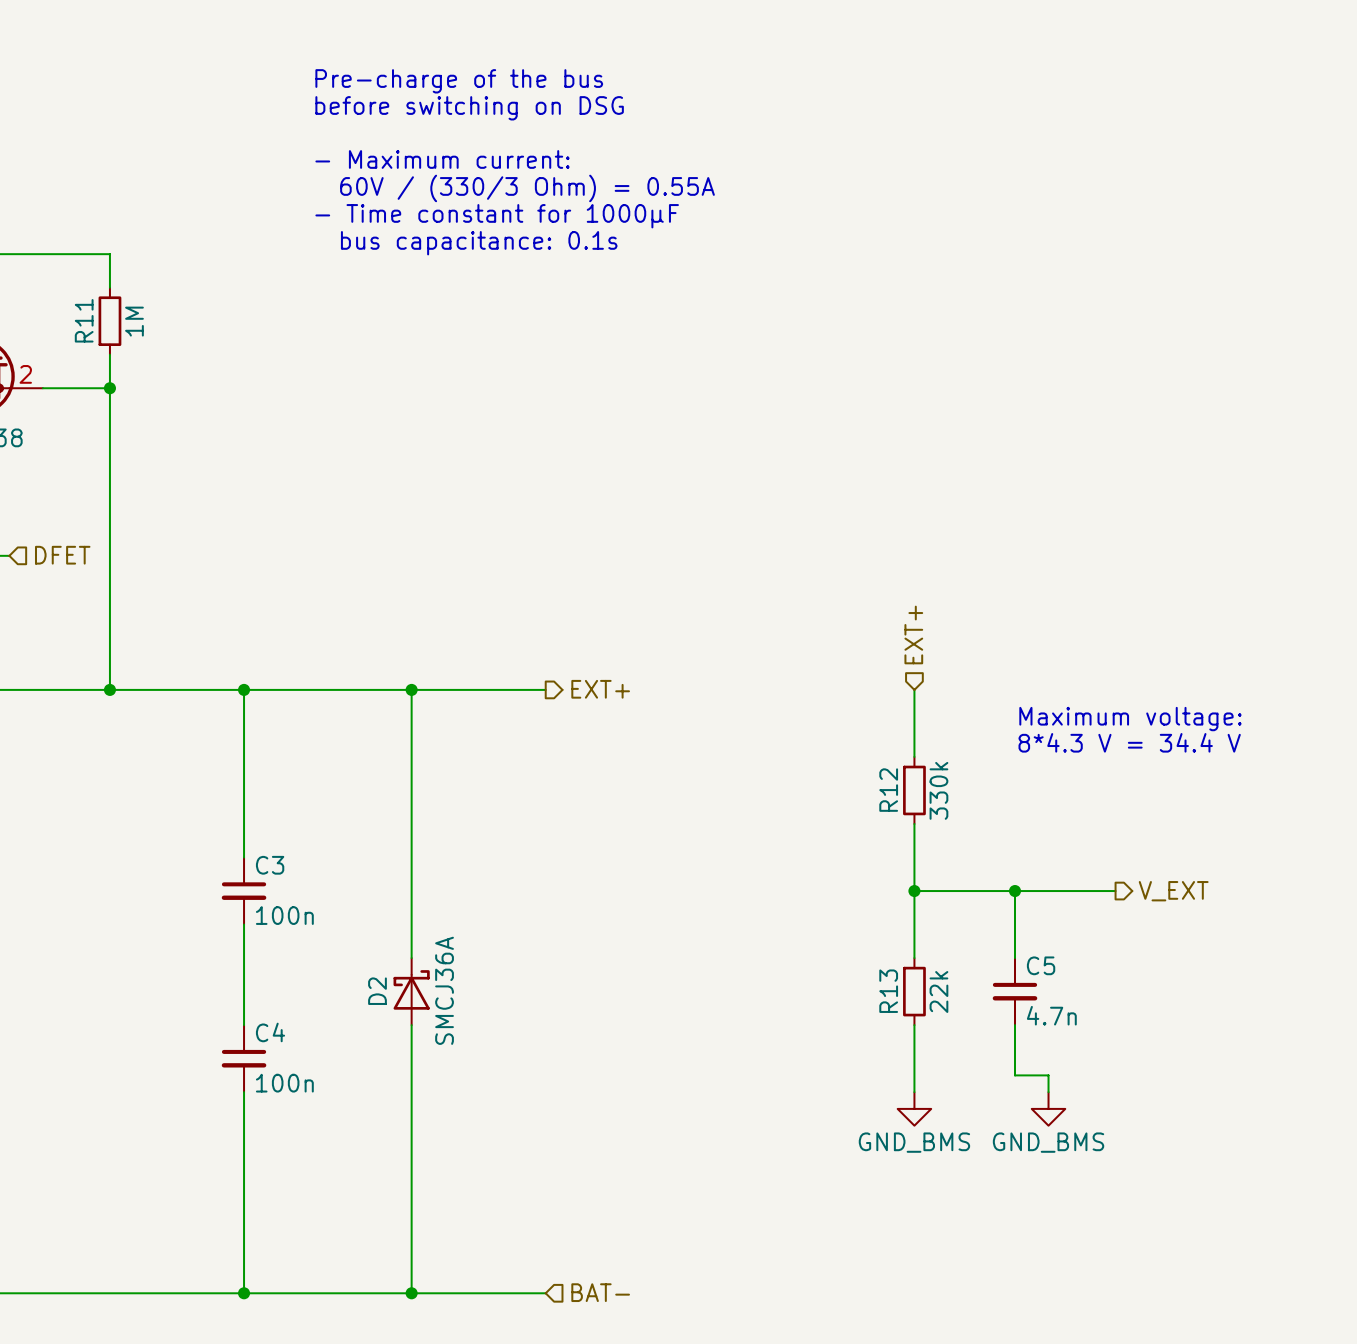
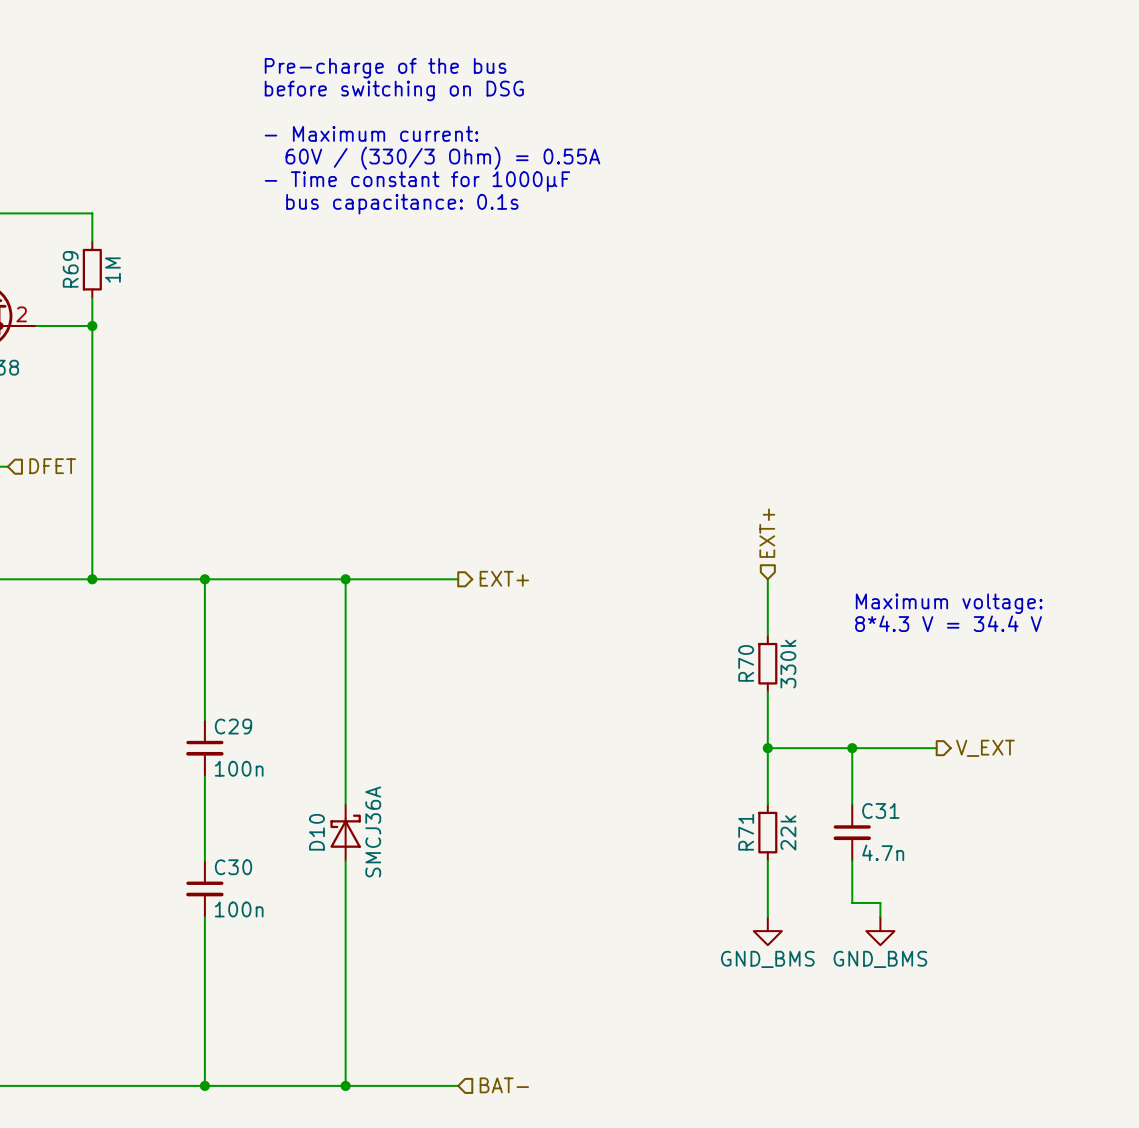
R11 name: R11 (84, 320) -> R69 (70, 269)
R12 name: R12 (888, 790) -> R70 (746, 663)
C3 name: C3 (270, 865) -> C29 (233, 726)
C5 name: C5 (1041, 965) -> C31 (880, 810)
D2 name: D2 (377, 991) -> D10 (316, 832)
R13 name: R13 (888, 991) -> R71 (746, 832)
C4 name: C4 (270, 1032) -> C30 (233, 867)

